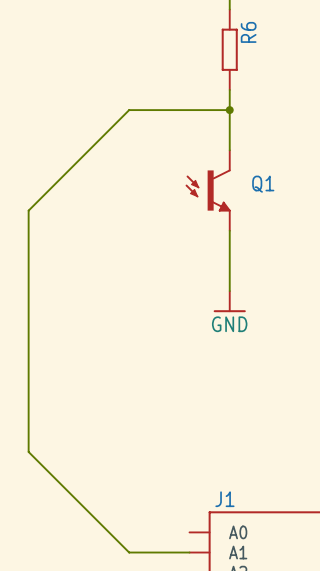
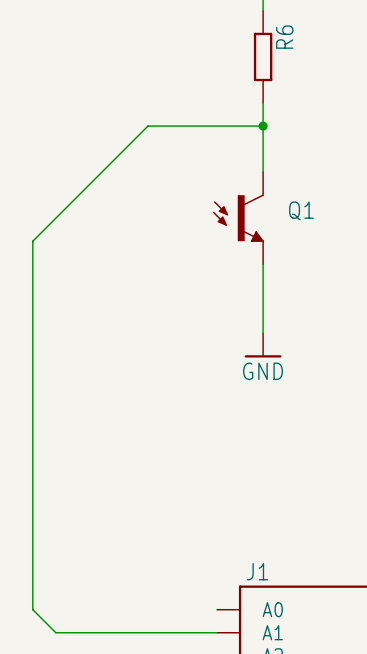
wire: (28, 451) (129, 552) -> (32, 517) (32, 609) (55, 632) (147, 632)

